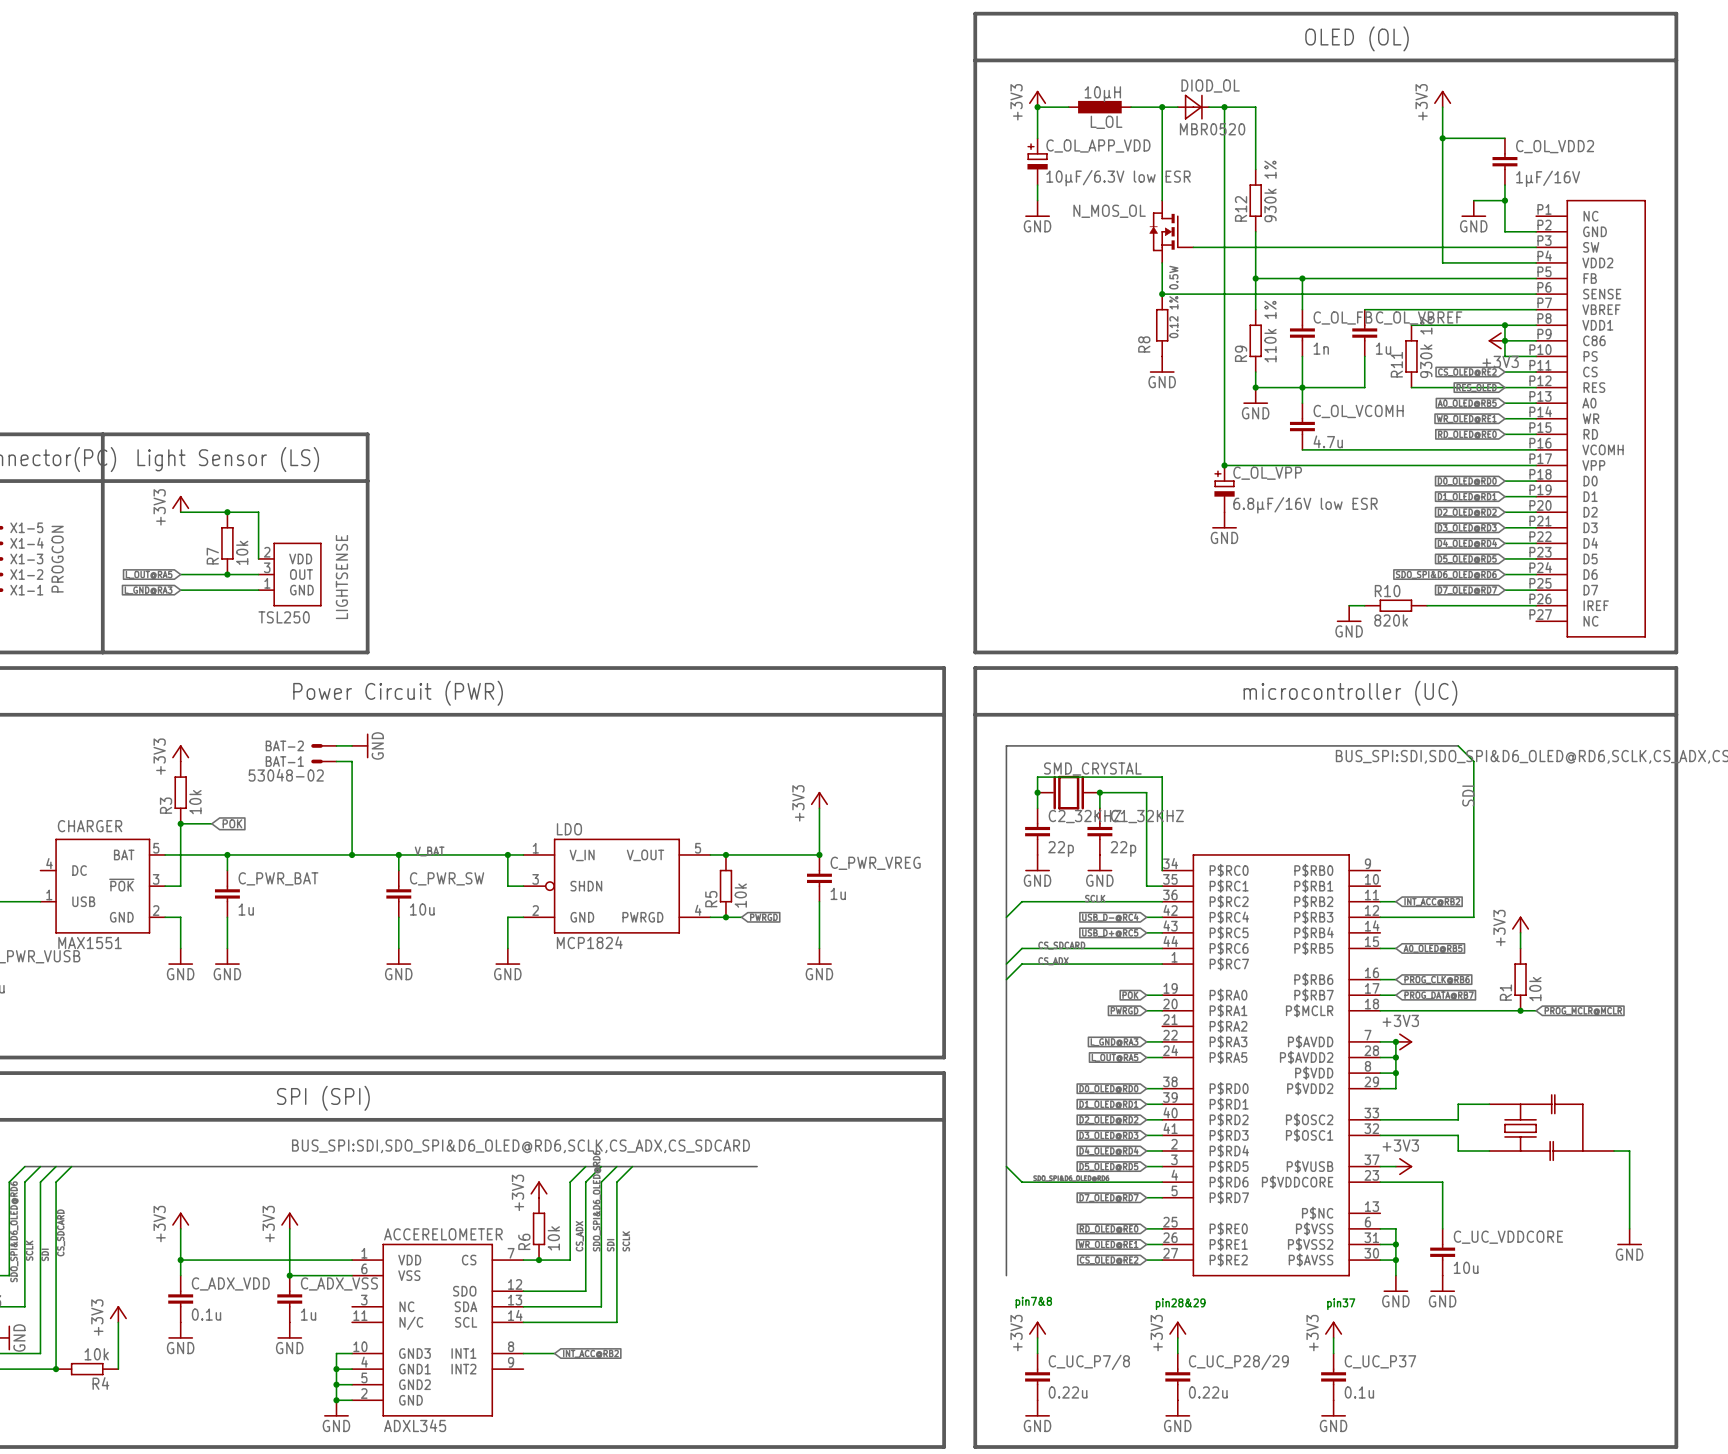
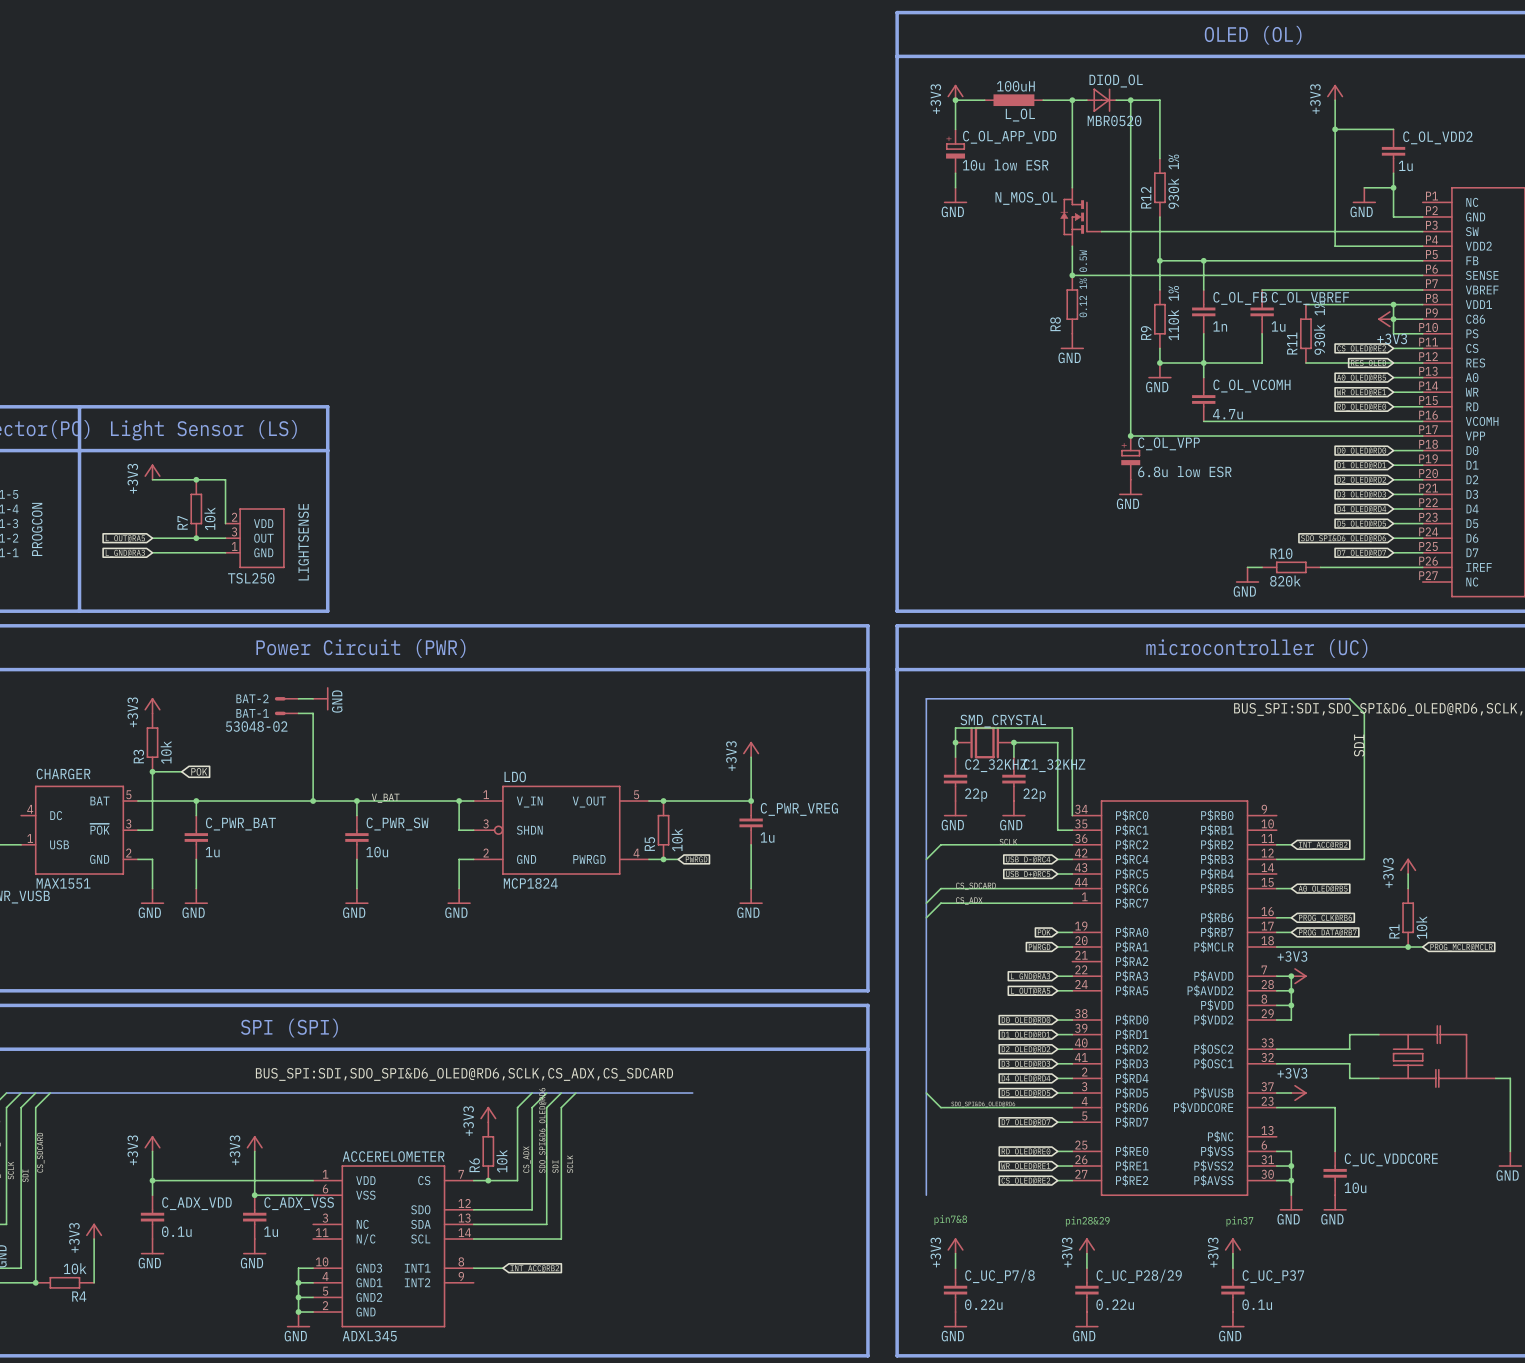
L_OL value: 10µH (1102, 94) -> 100uH (1015, 86)
C_OL_APP_VDD value: 10µF/6.3V low ESR (1118, 178) -> 10u low ESR (1005, 165)
C_OL_VDD2 value: 1µF/16V (1548, 178) -> 1u (1405, 165)
C_OL_VPP value: 6.8µF/16V low ESR (1305, 505) -> 6.8u low ESR (1184, 471)

